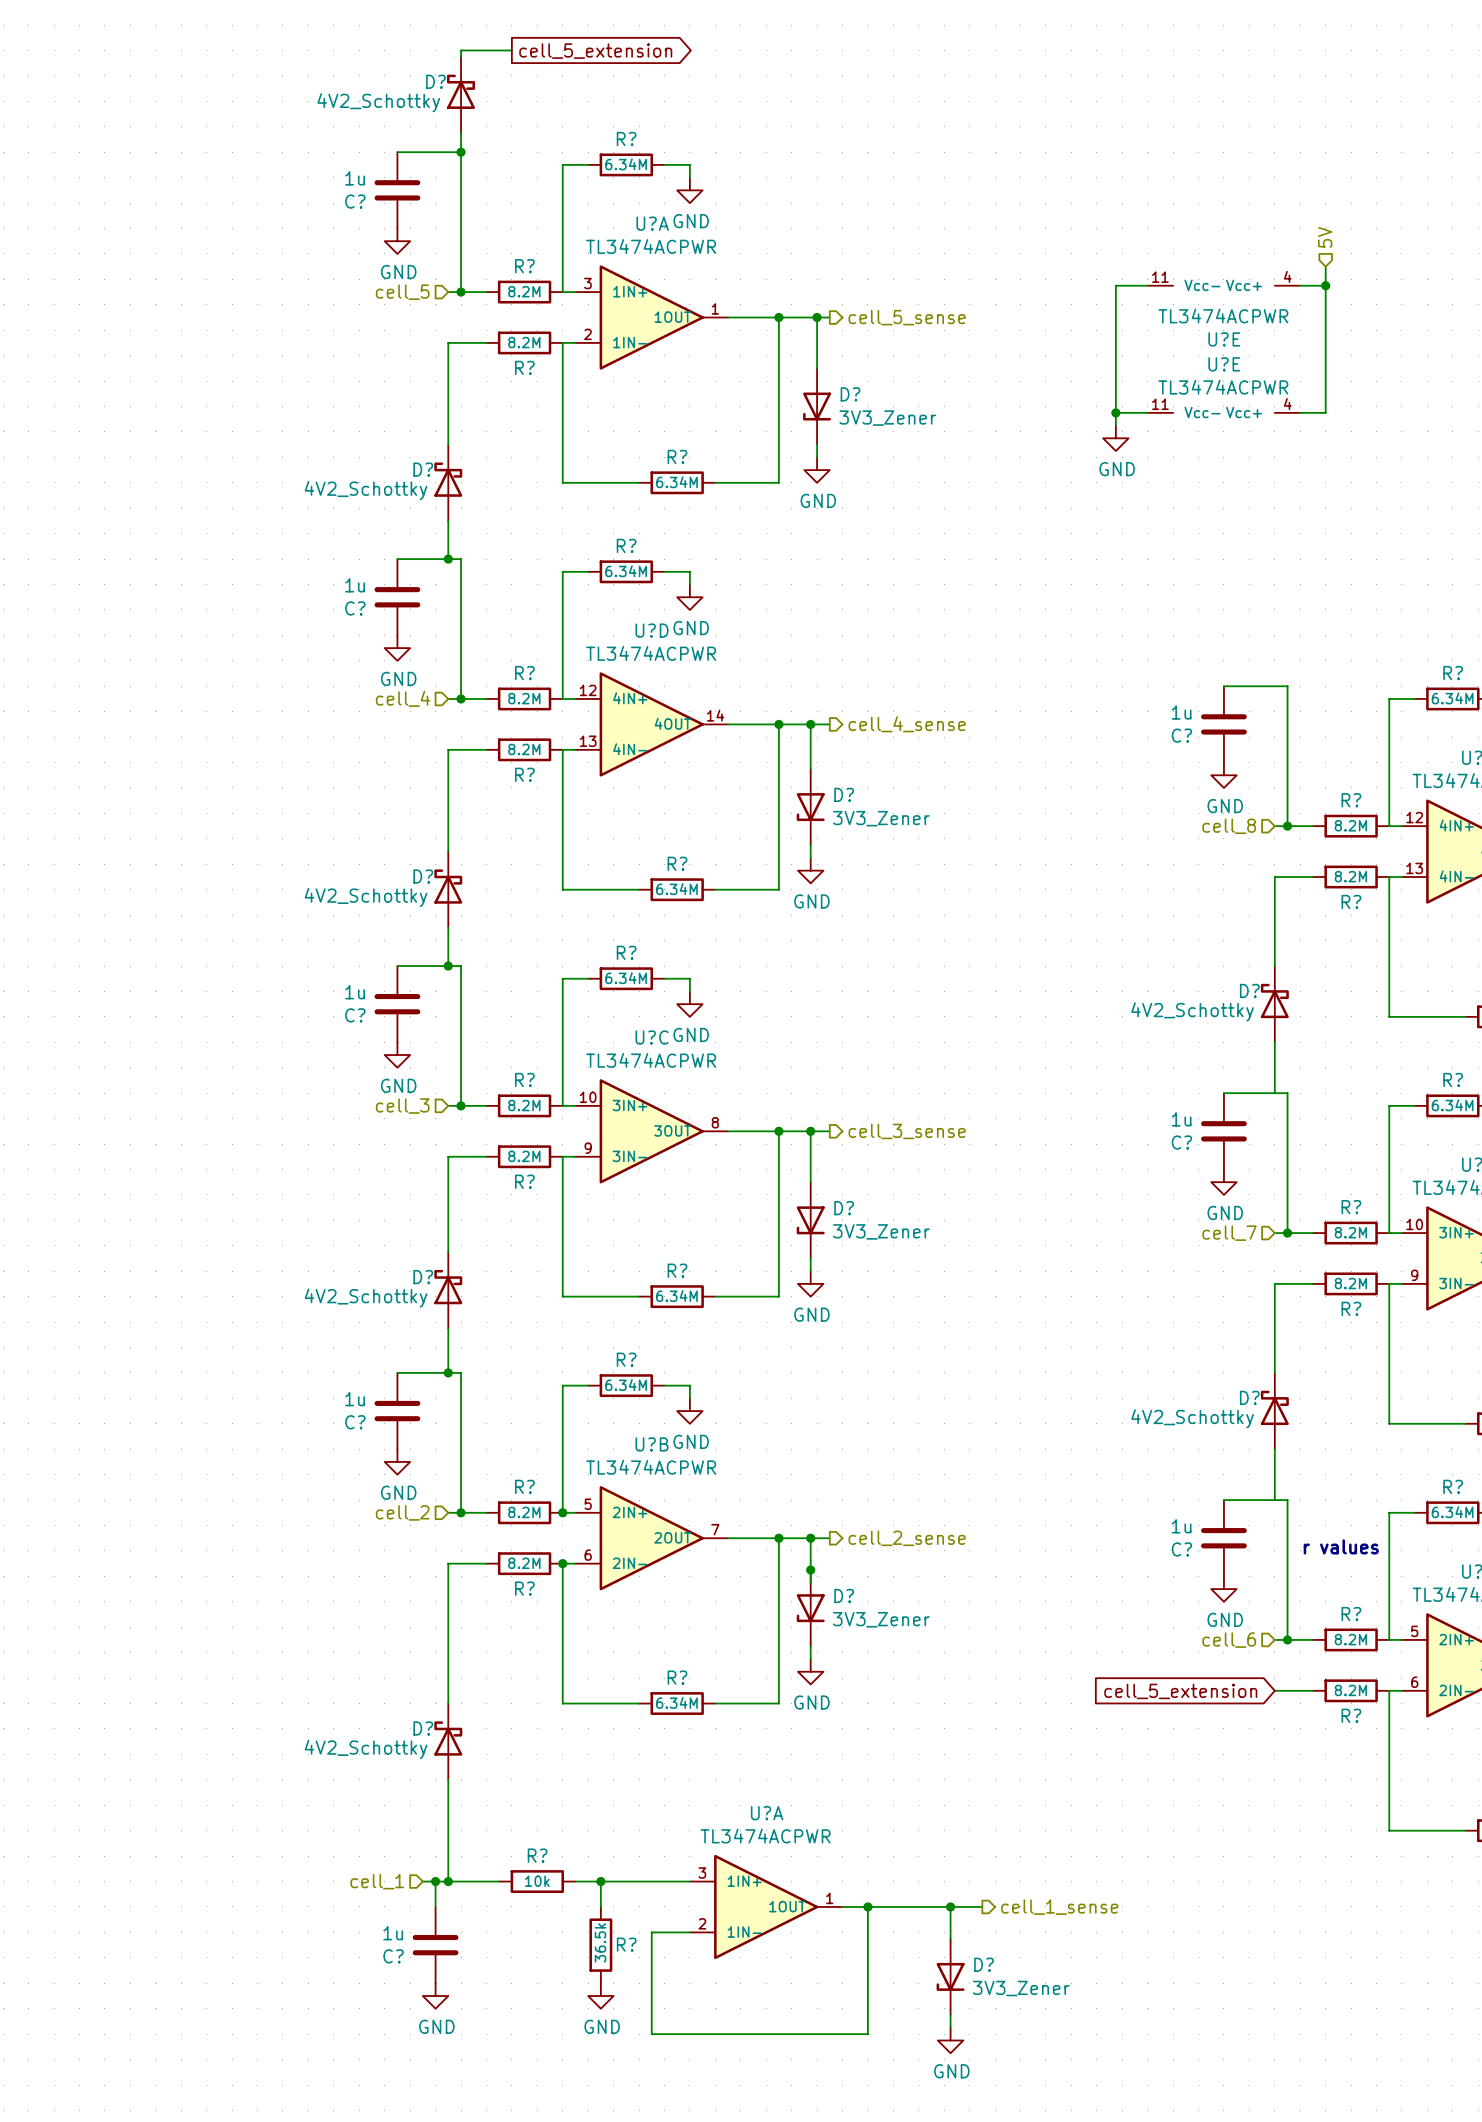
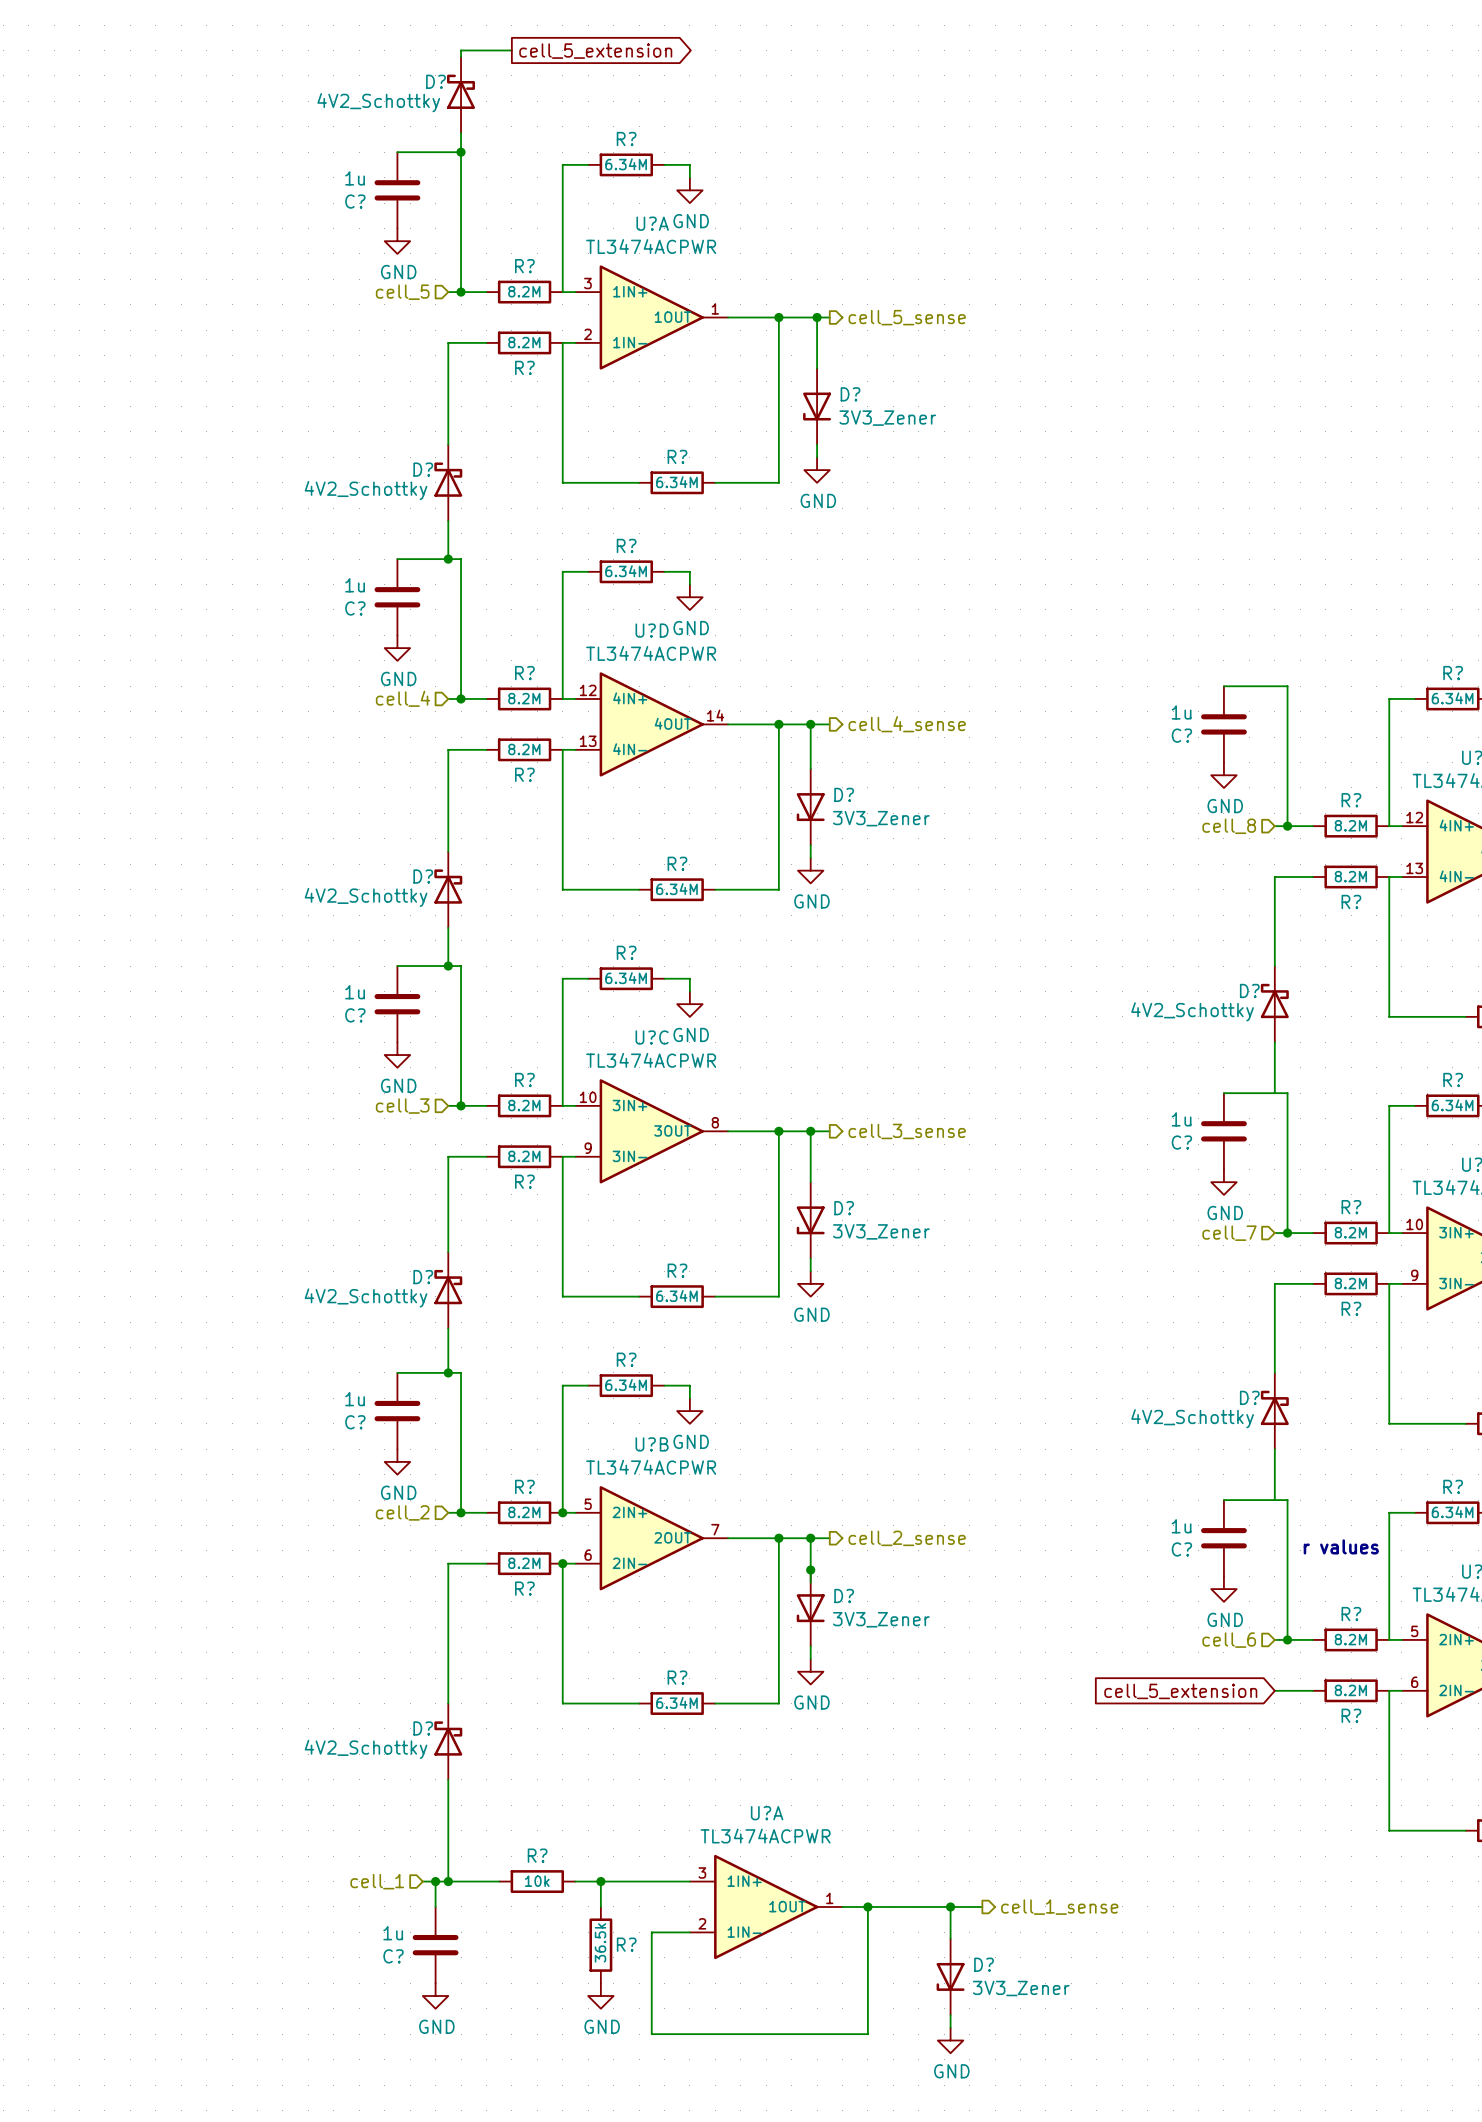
hierarchical label: 5V (1325, 237) -> none
wire: (1325, 266) (1325, 412) (1300, 412) -> none
wire: (1147, 285) (1115, 285) (1115, 425) -> none
U?E: TL3474ACPWR (1223, 285) -> none
wire: (1300, 285) (1325, 285) -> none
junction: (1325, 285) -> none
wire: (1115, 412) (1147, 412) -> none
junction: (1115, 412) -> none
U?E: TL3474ACPWR (1223, 412) -> none
power symbol: GND (1115, 438) -> none

